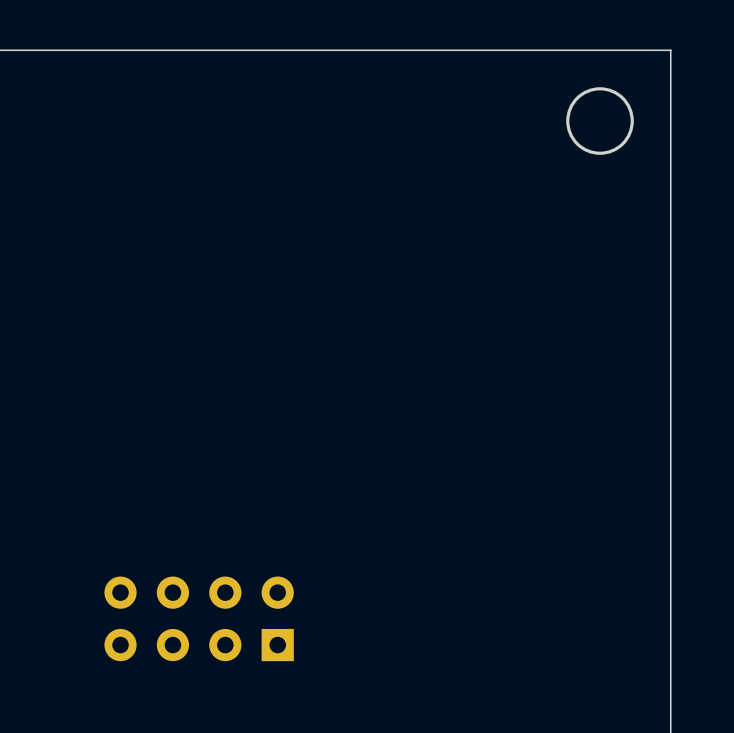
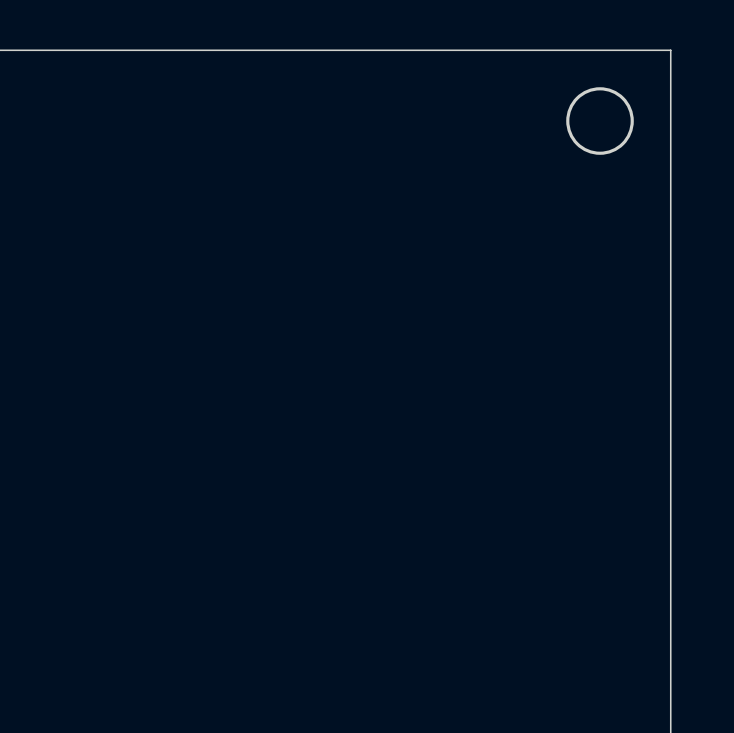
part: (199, 618) -> none

